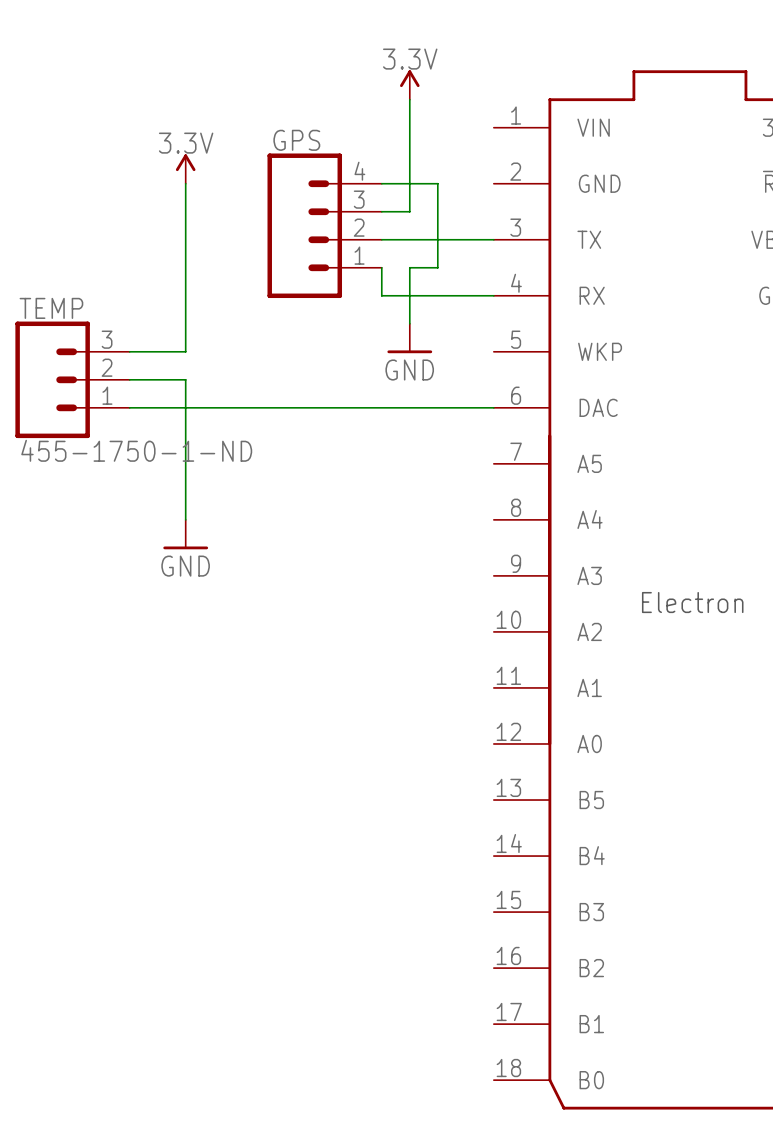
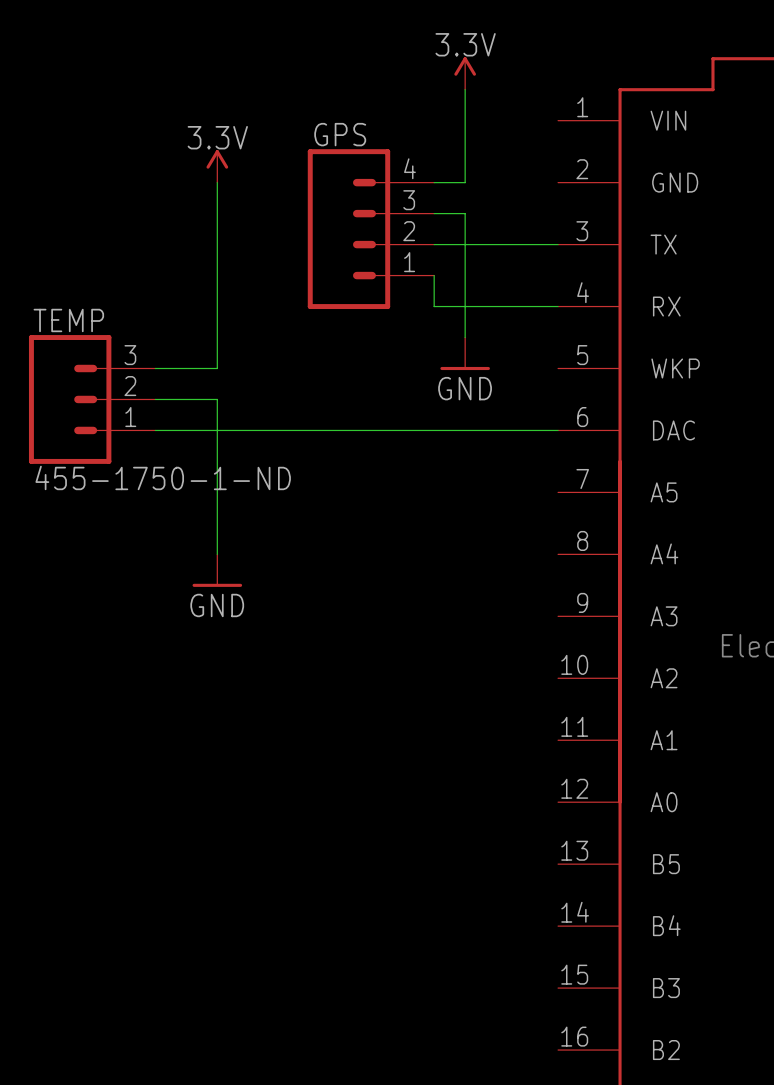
wire: (409, 211) (409, 183) (437, 183) (437, 267) (409, 267) -> (465, 213) (465, 275)

